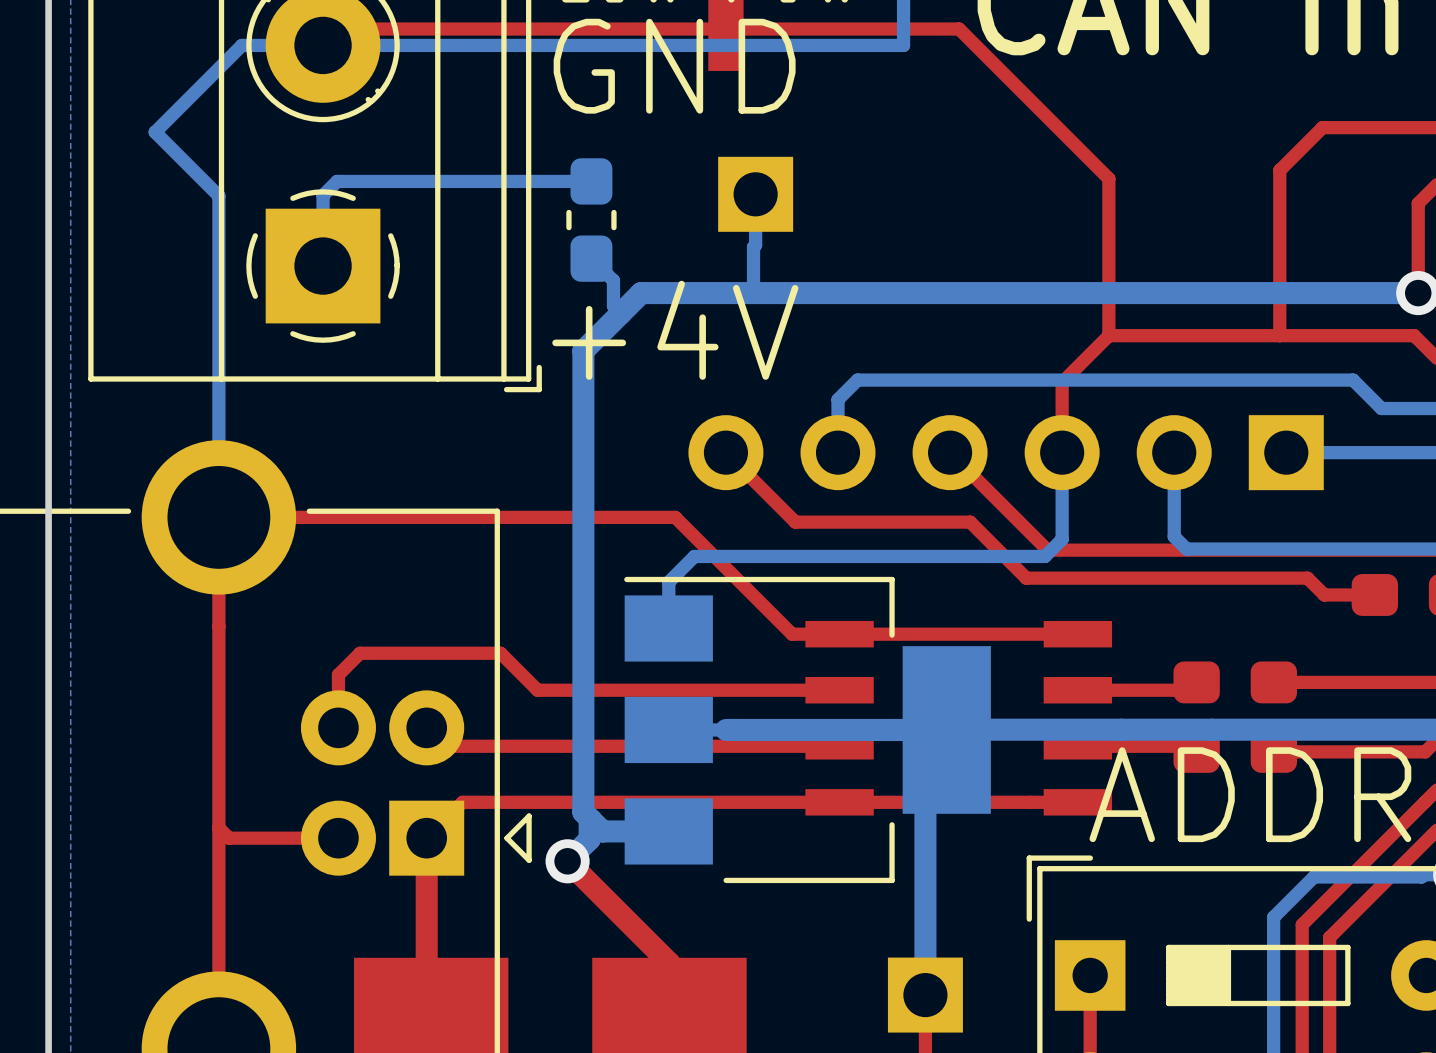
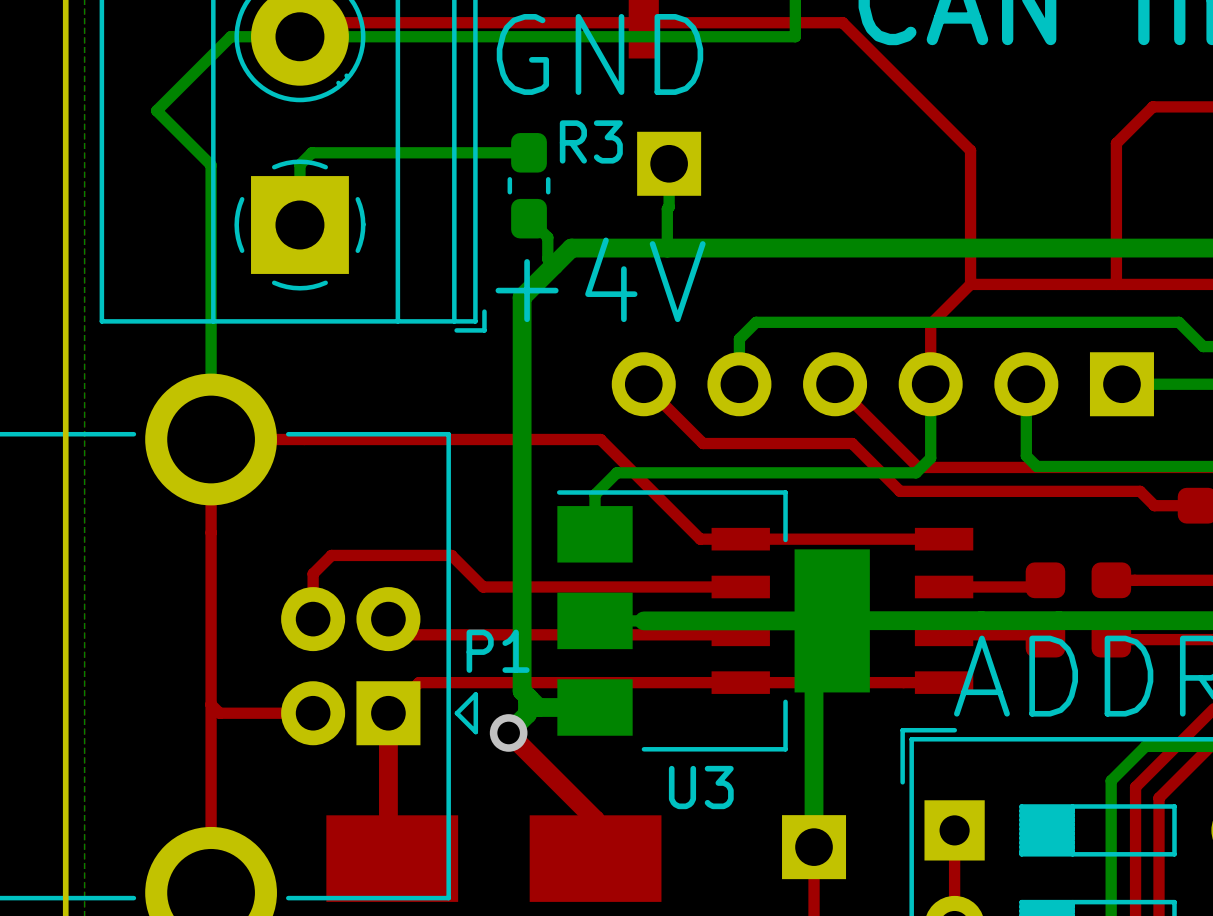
R3 name: none -> R3 (591, 141)
P1 name: none -> P1 (498, 651)
U3 name: none -> U3 (701, 787)

